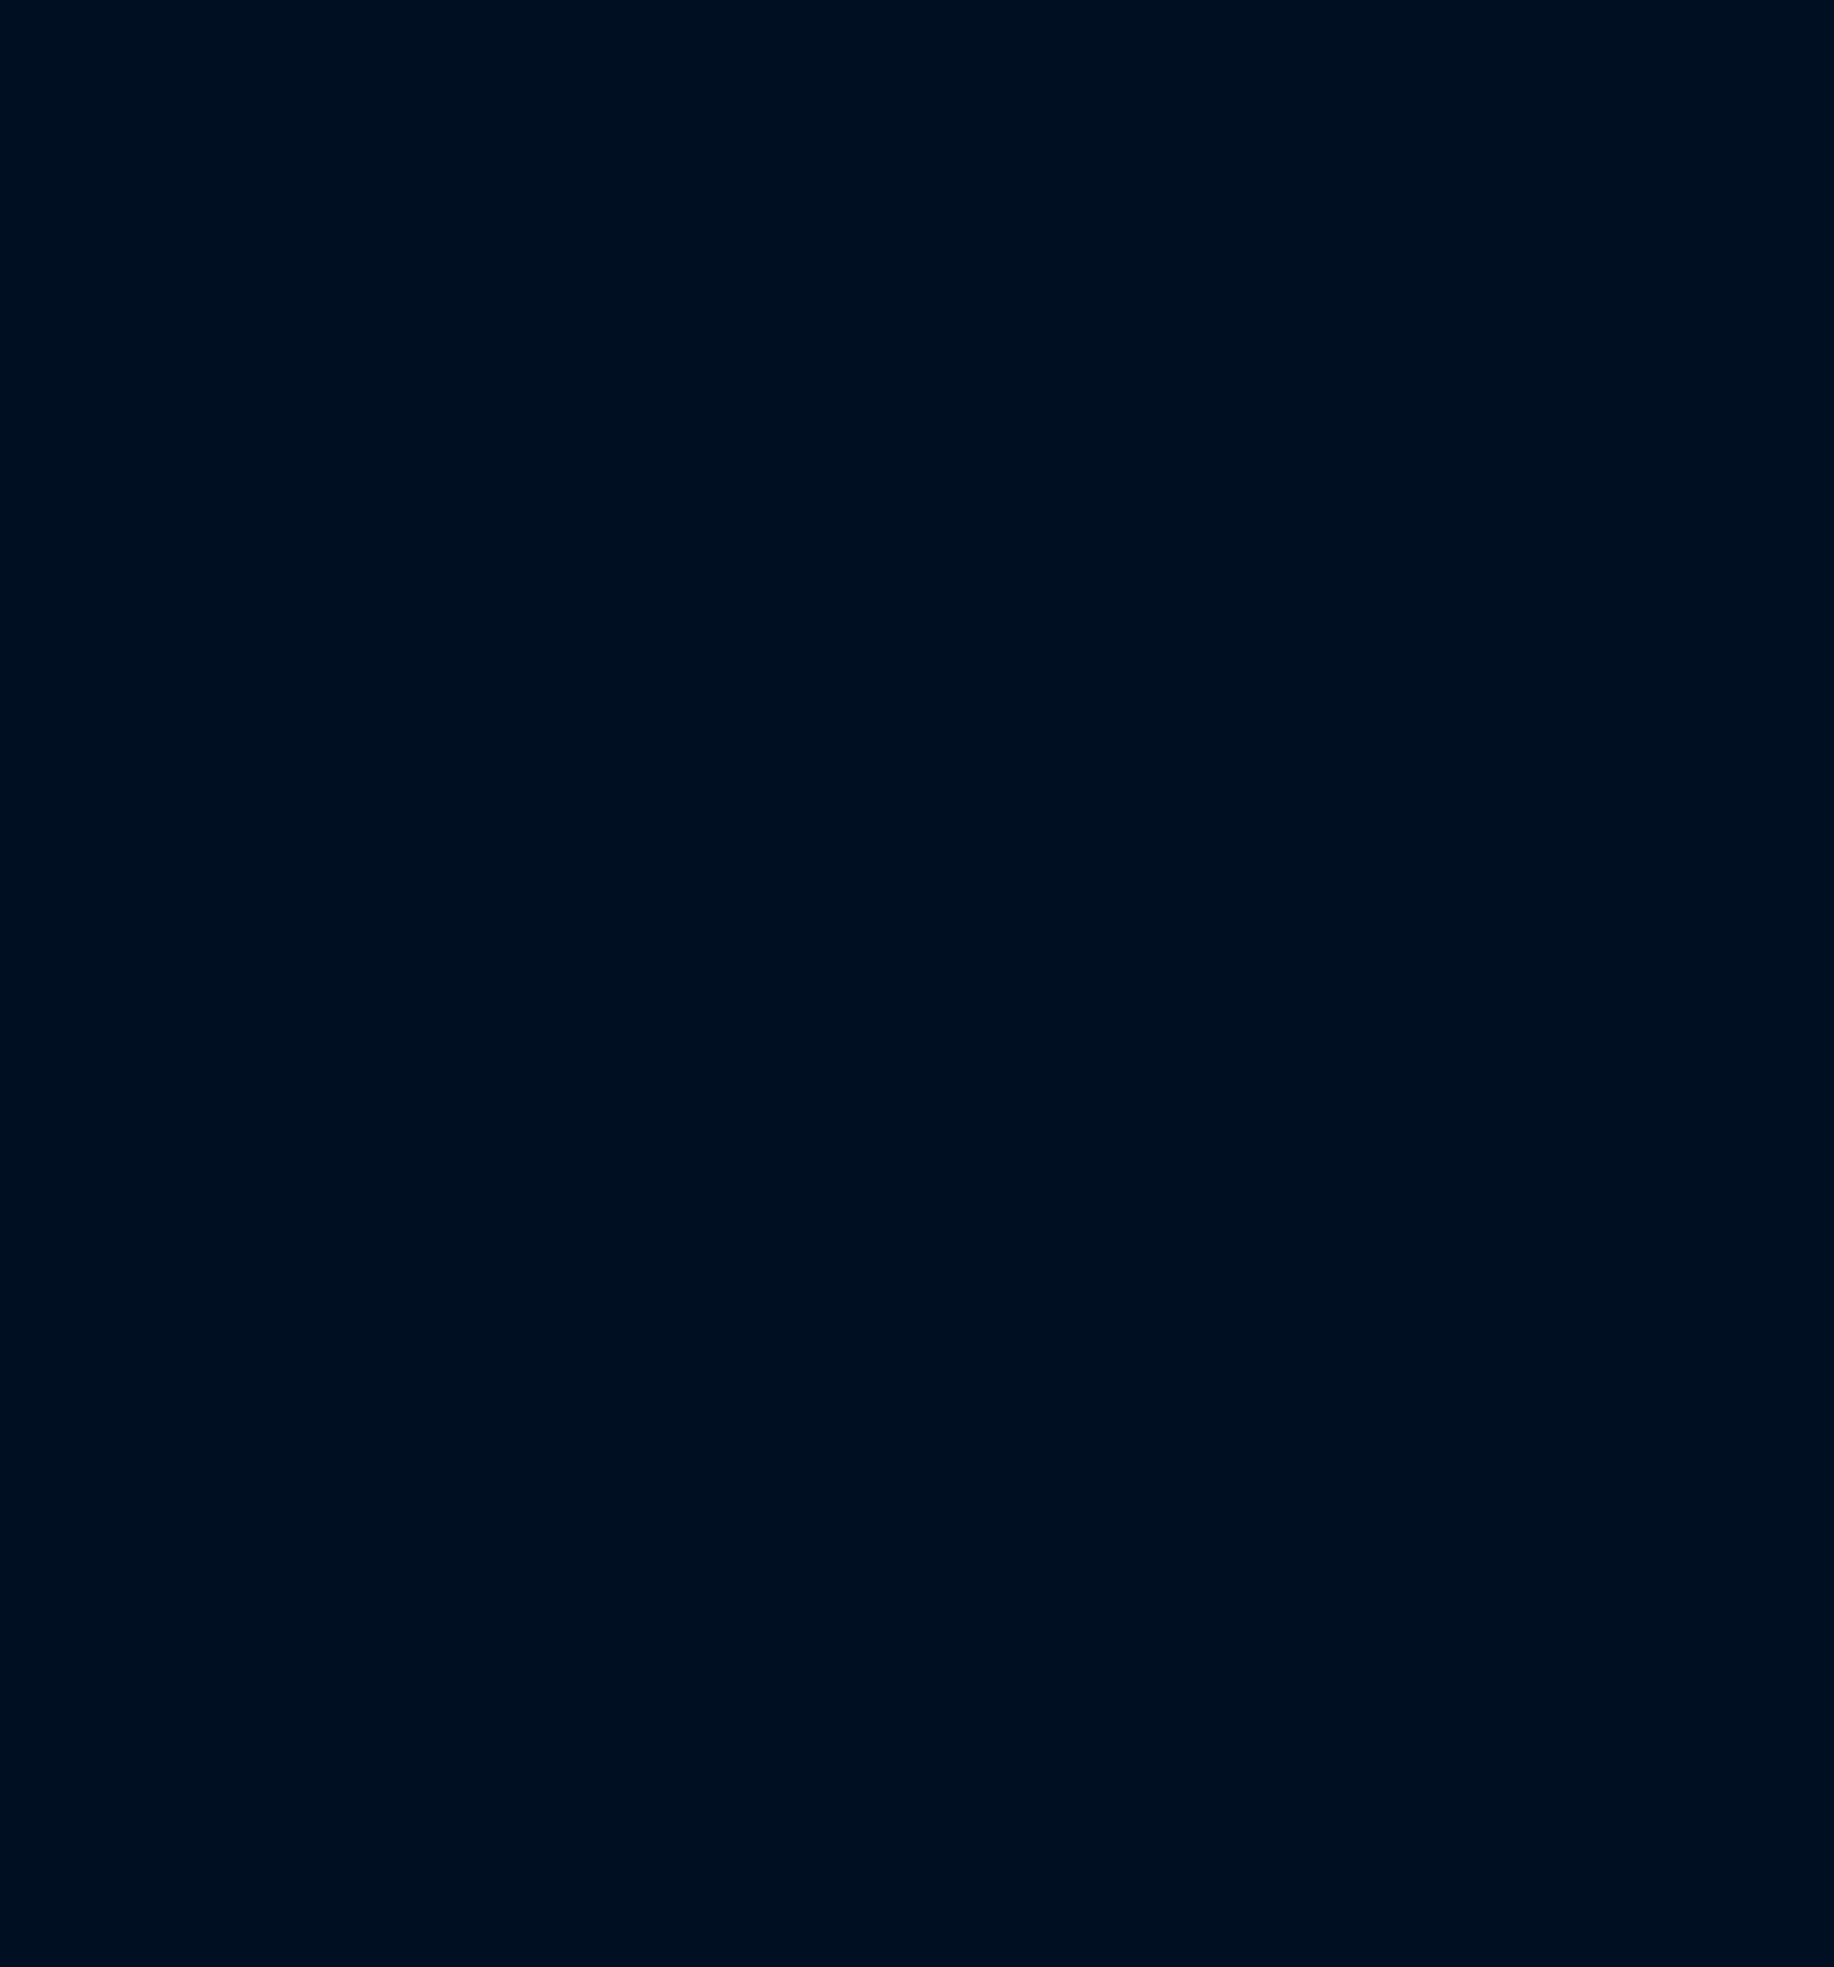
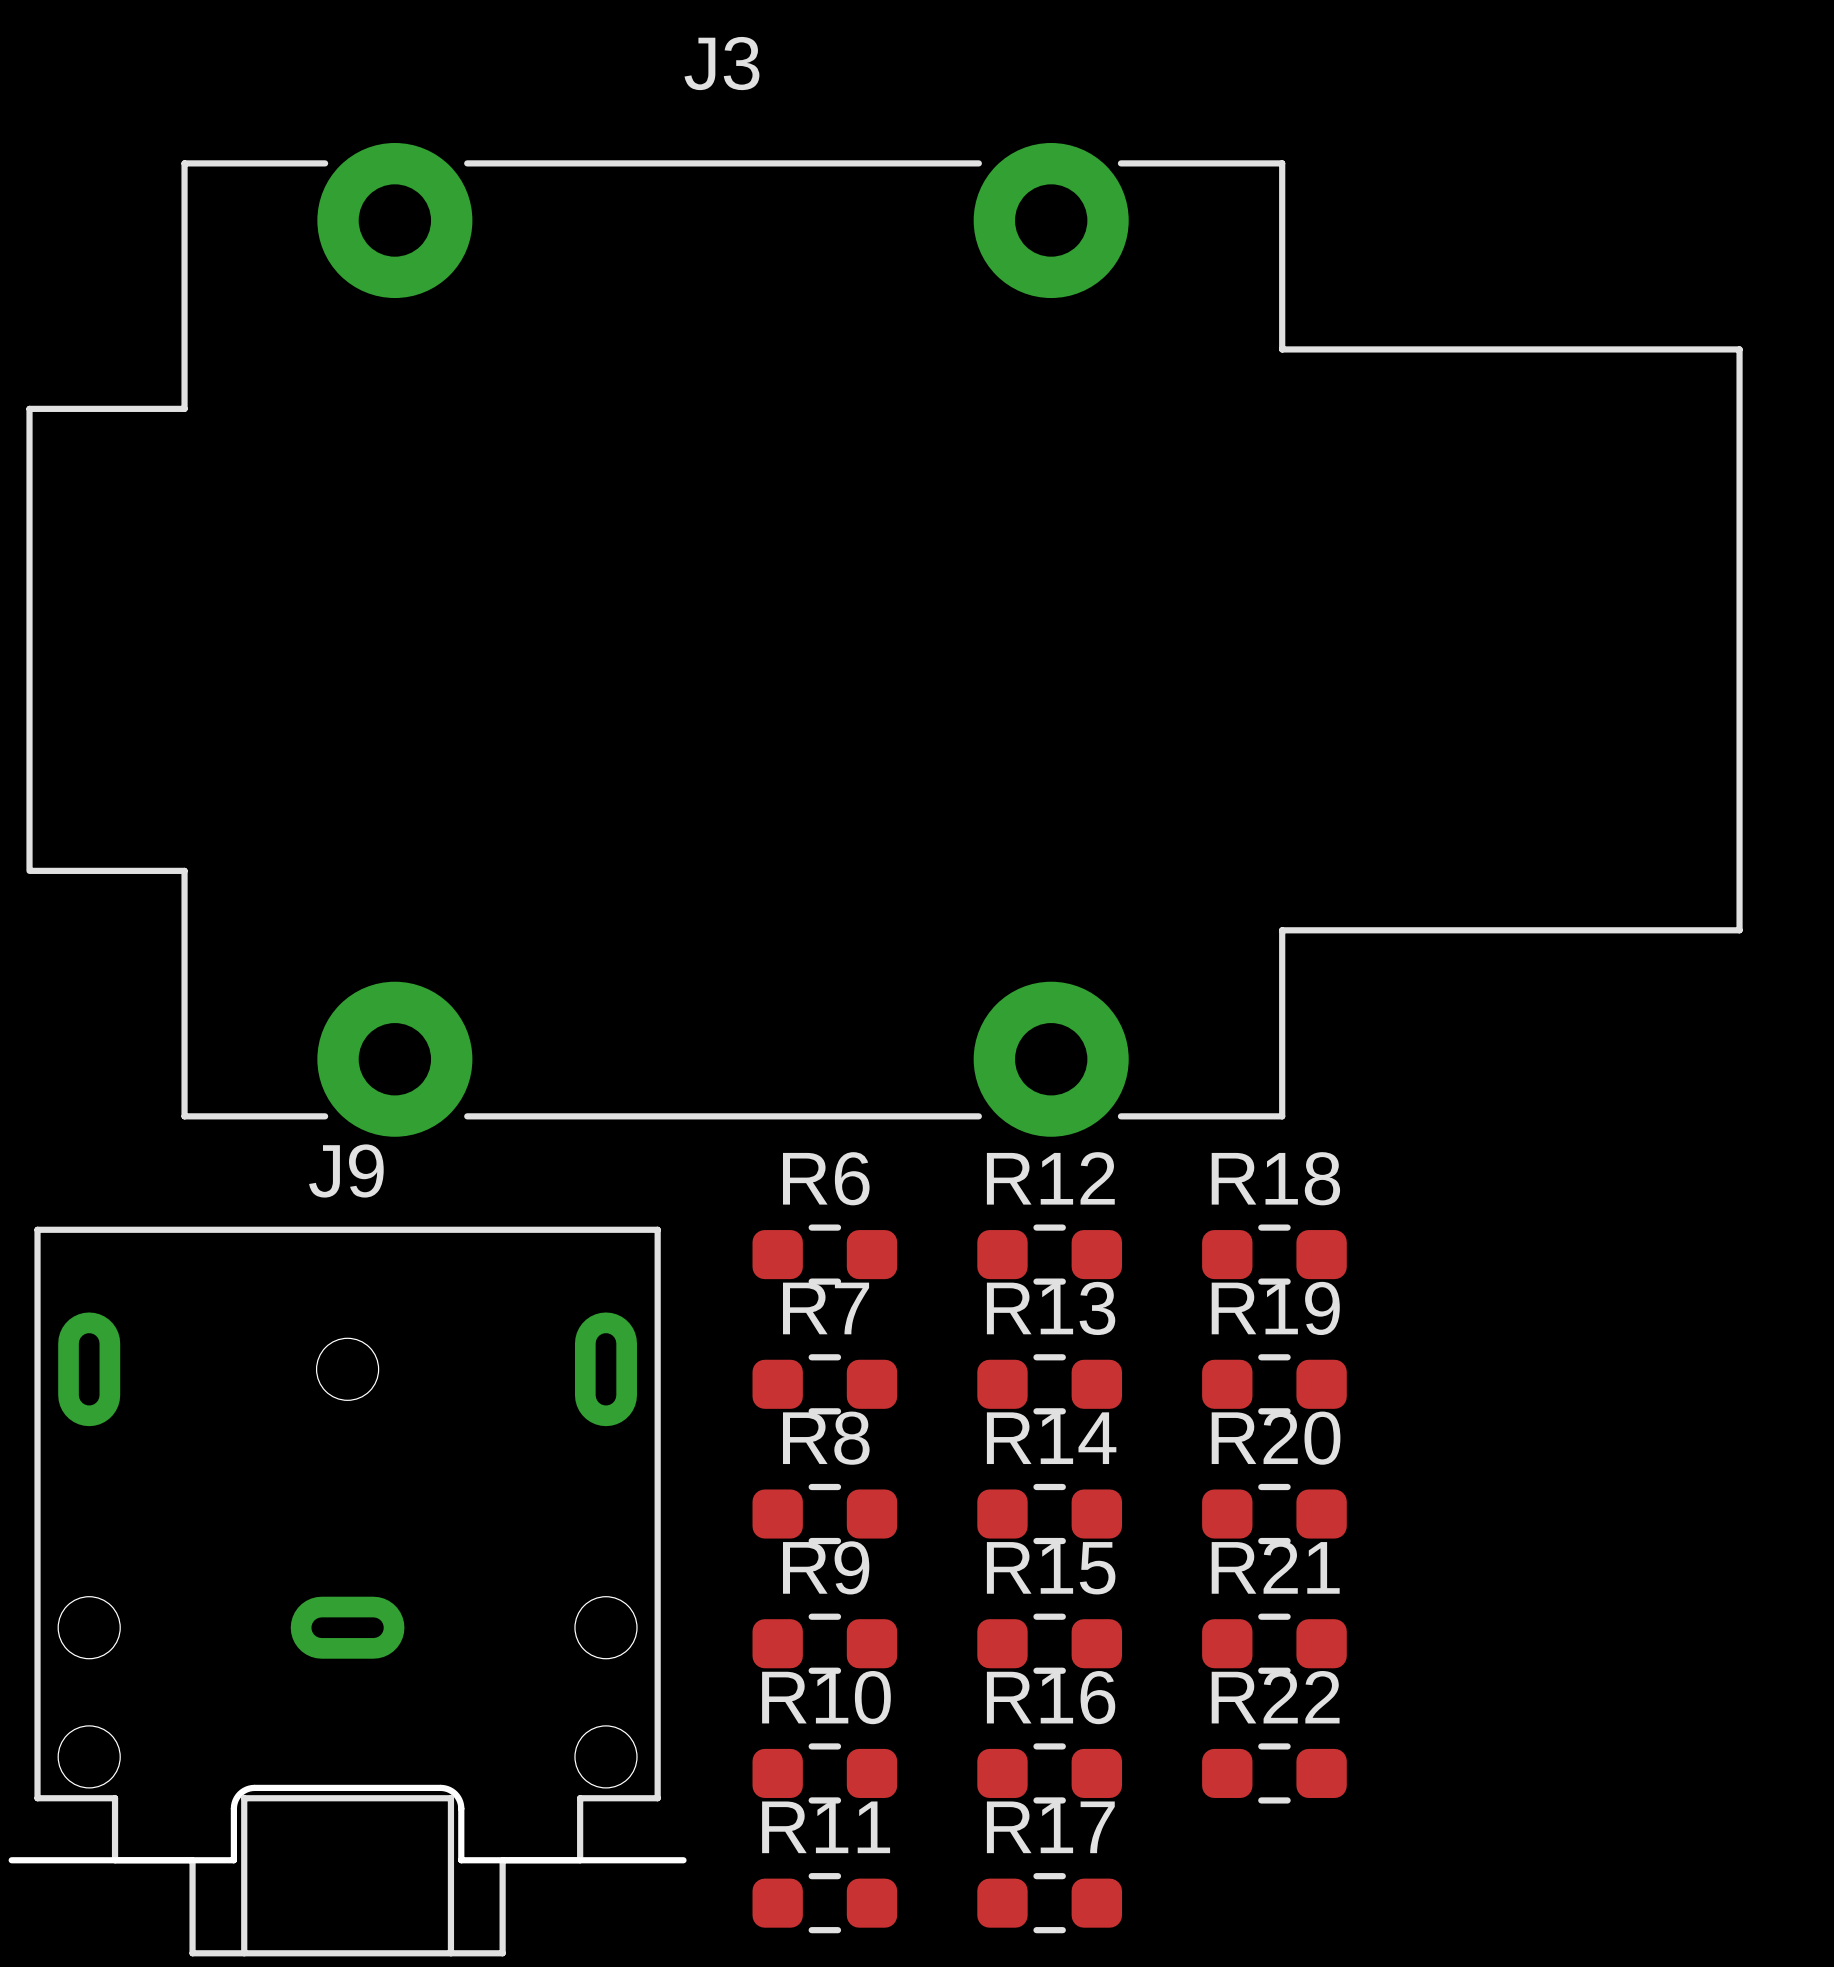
J3: none -> (884, 639)
R6: none -> (824, 1254)
R12: none -> (1049, 1254)
R18: none -> (1274, 1254)
R7: none -> (824, 1384)
R13: none -> (1049, 1384)
R19: none -> (1274, 1384)
R8: none -> (824, 1514)
R14: none -> (1049, 1514)
R20: none -> (1274, 1514)
J9: none -> (347, 1591)
R9: none -> (824, 1643)
R15: none -> (1049, 1643)
R21: none -> (1274, 1643)
R10: none -> (824, 1773)
R16: none -> (1049, 1773)
R22: none -> (1274, 1773)
R11: none -> (824, 1903)
R17: none -> (1049, 1903)

